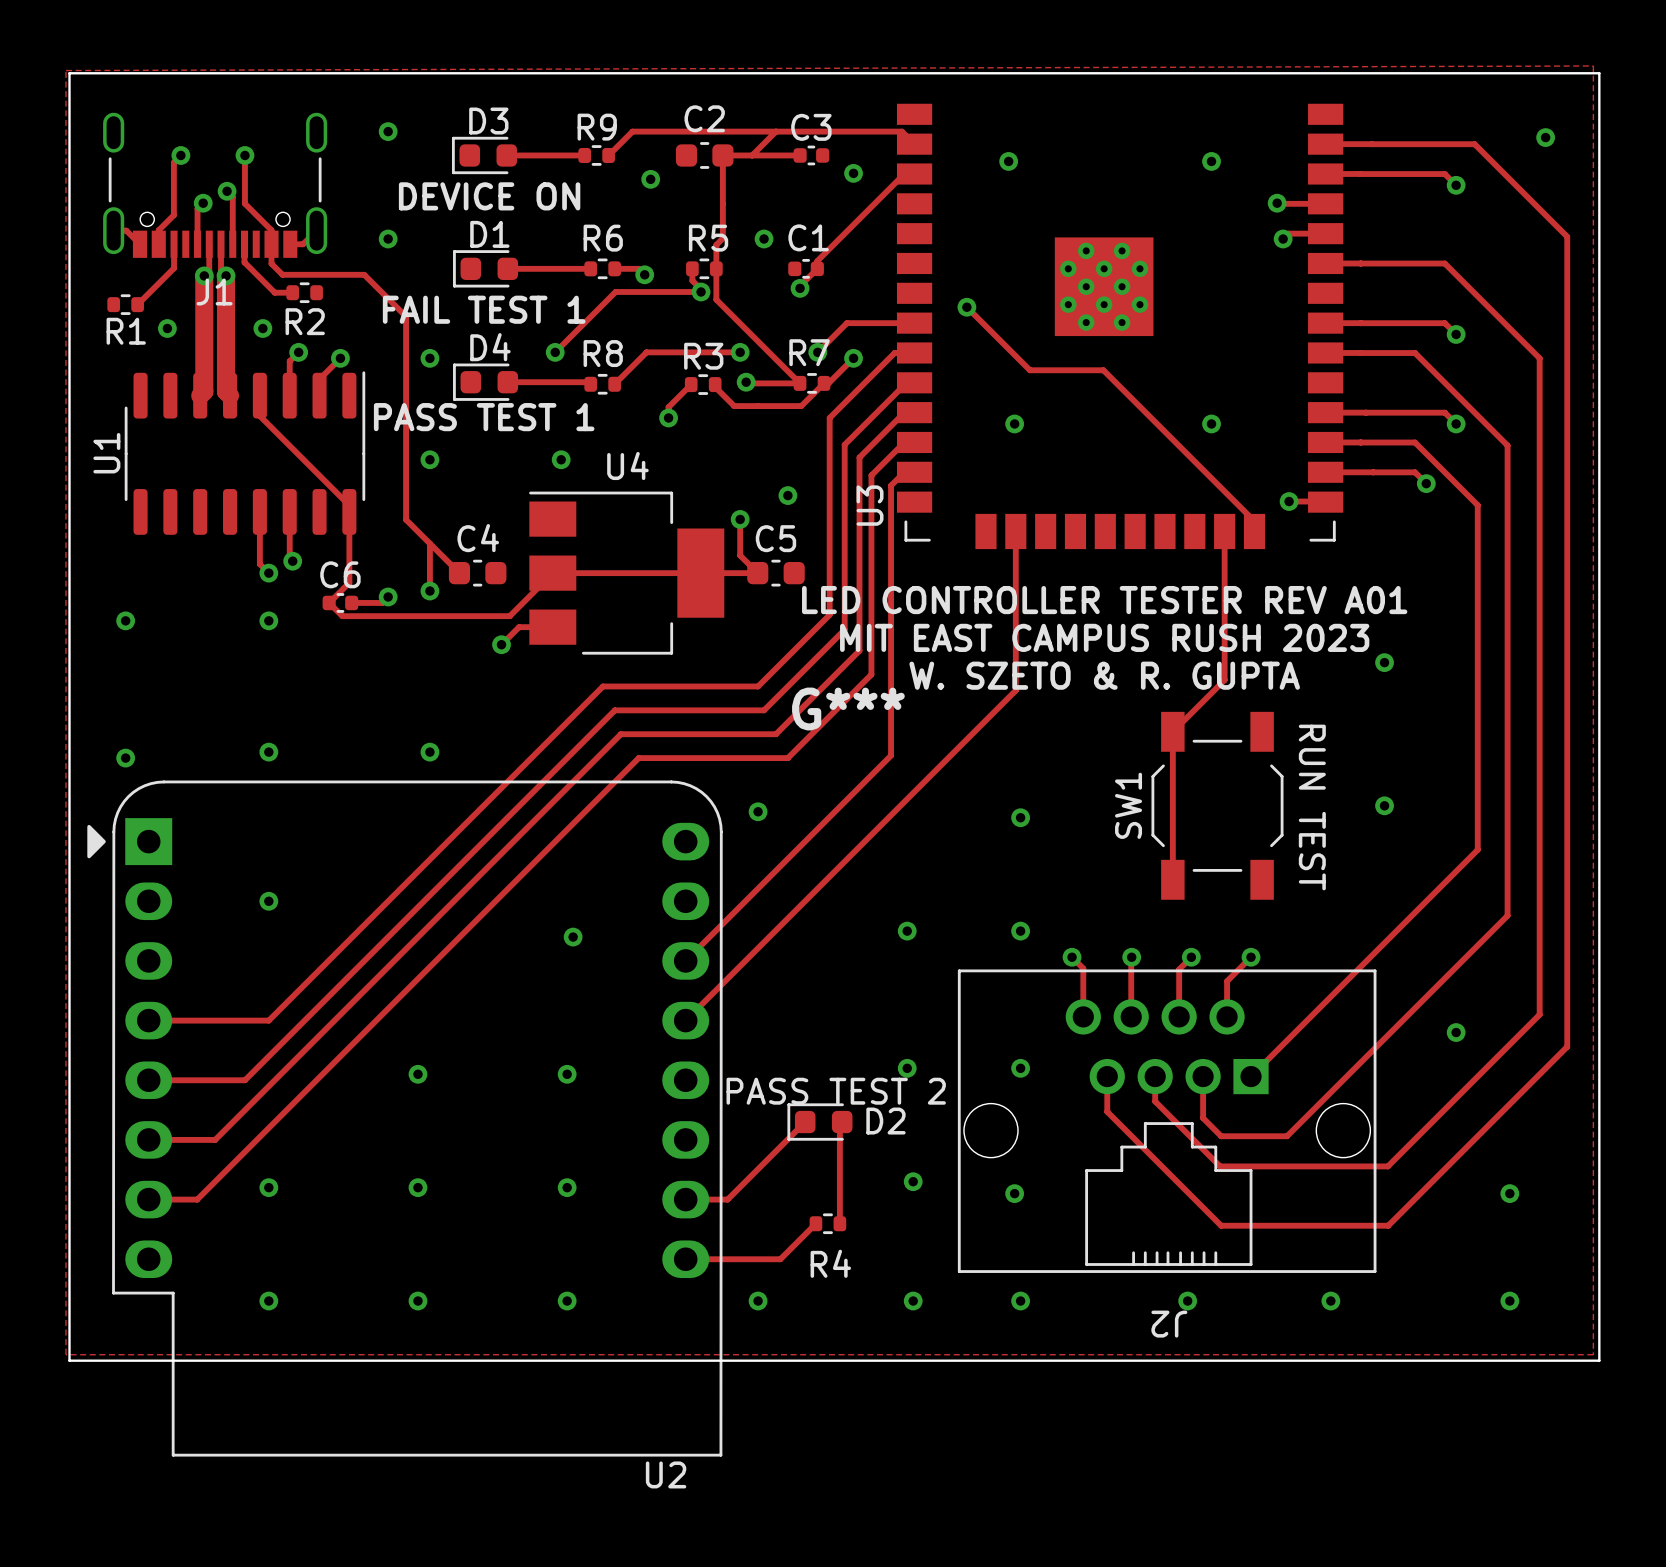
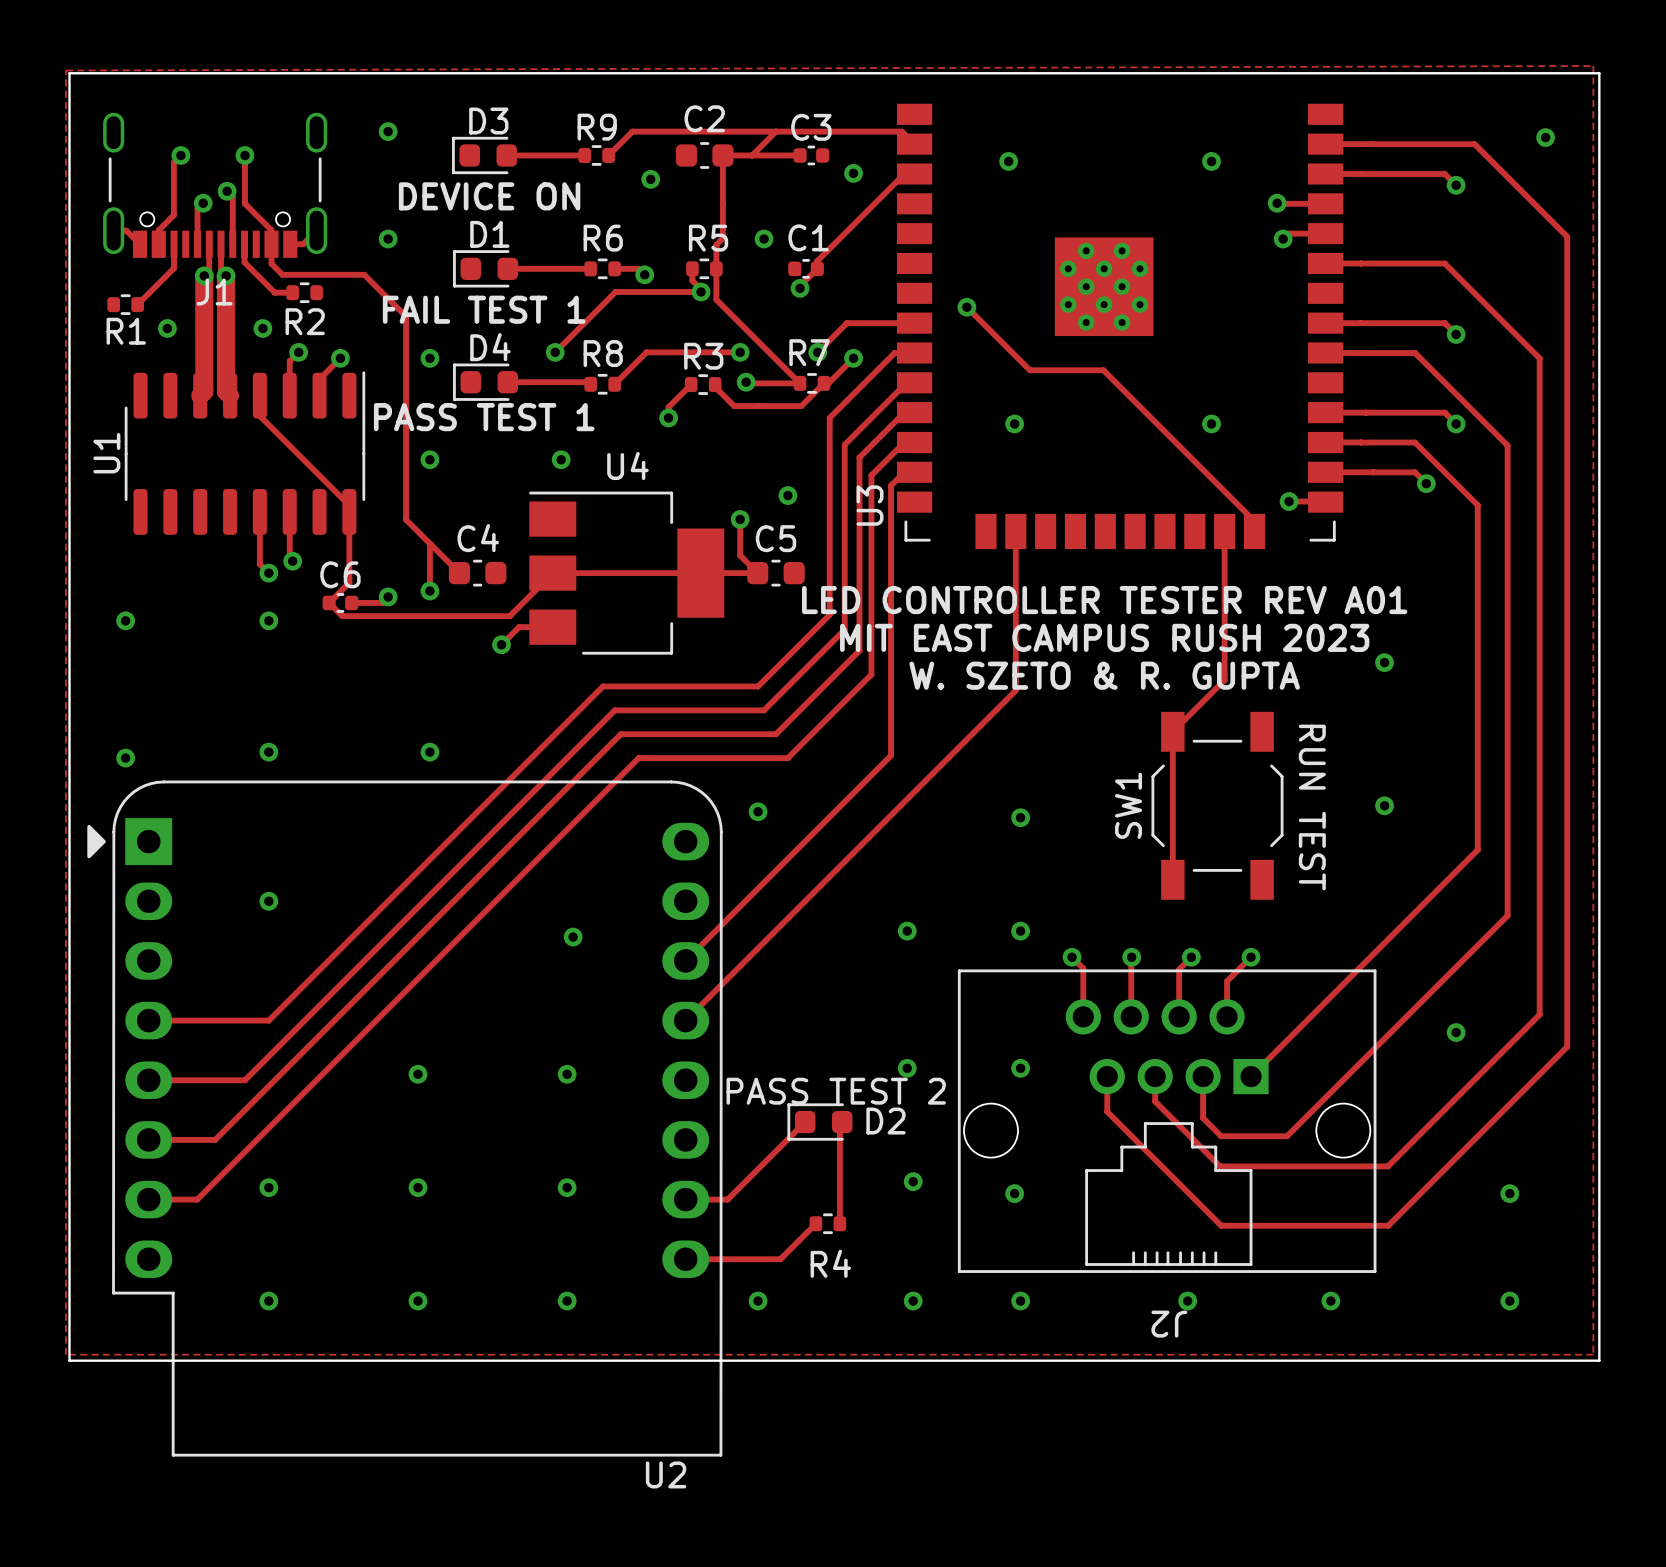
G***: (848, 709) -> none

